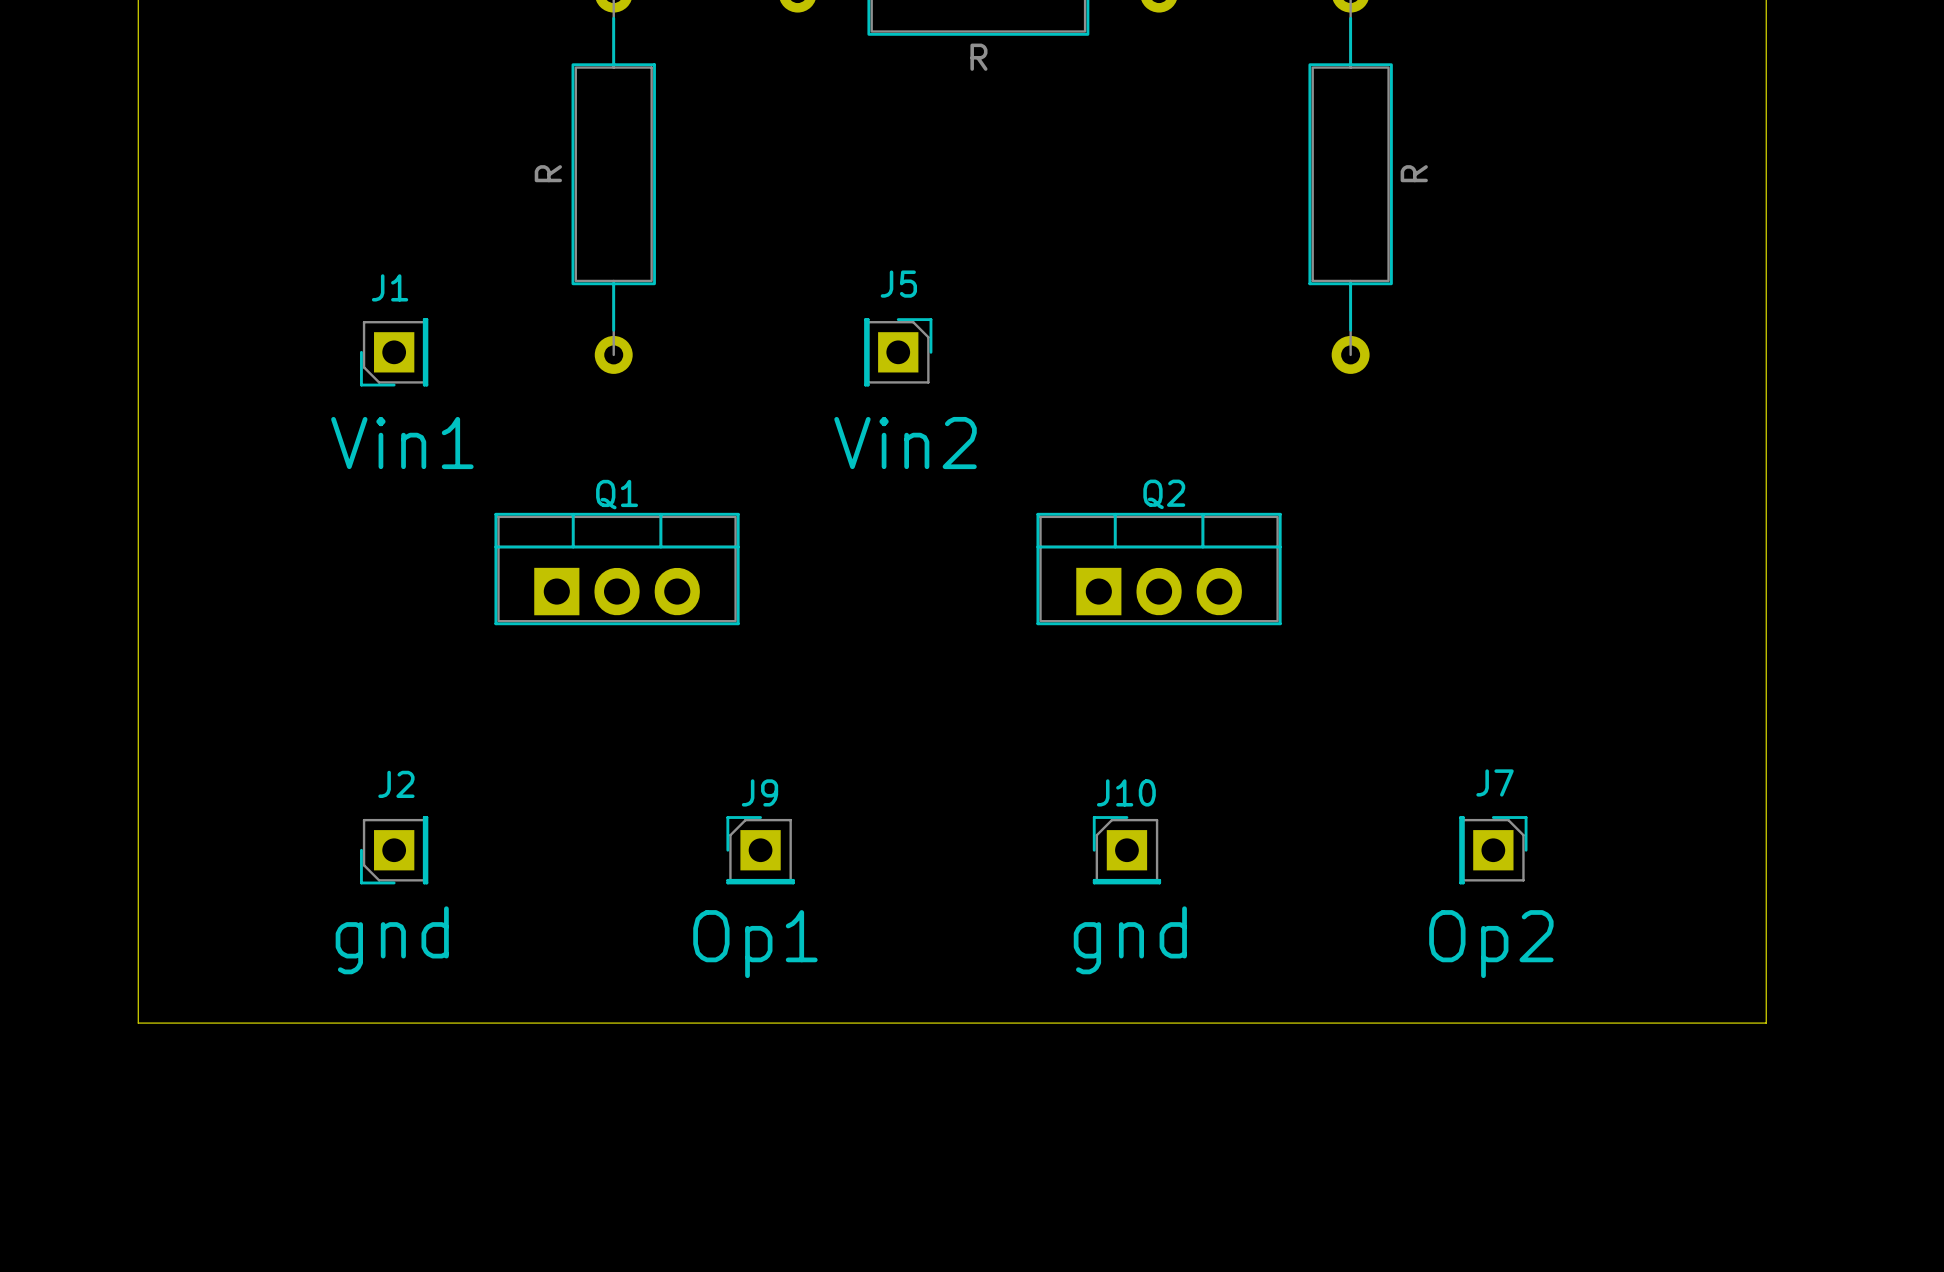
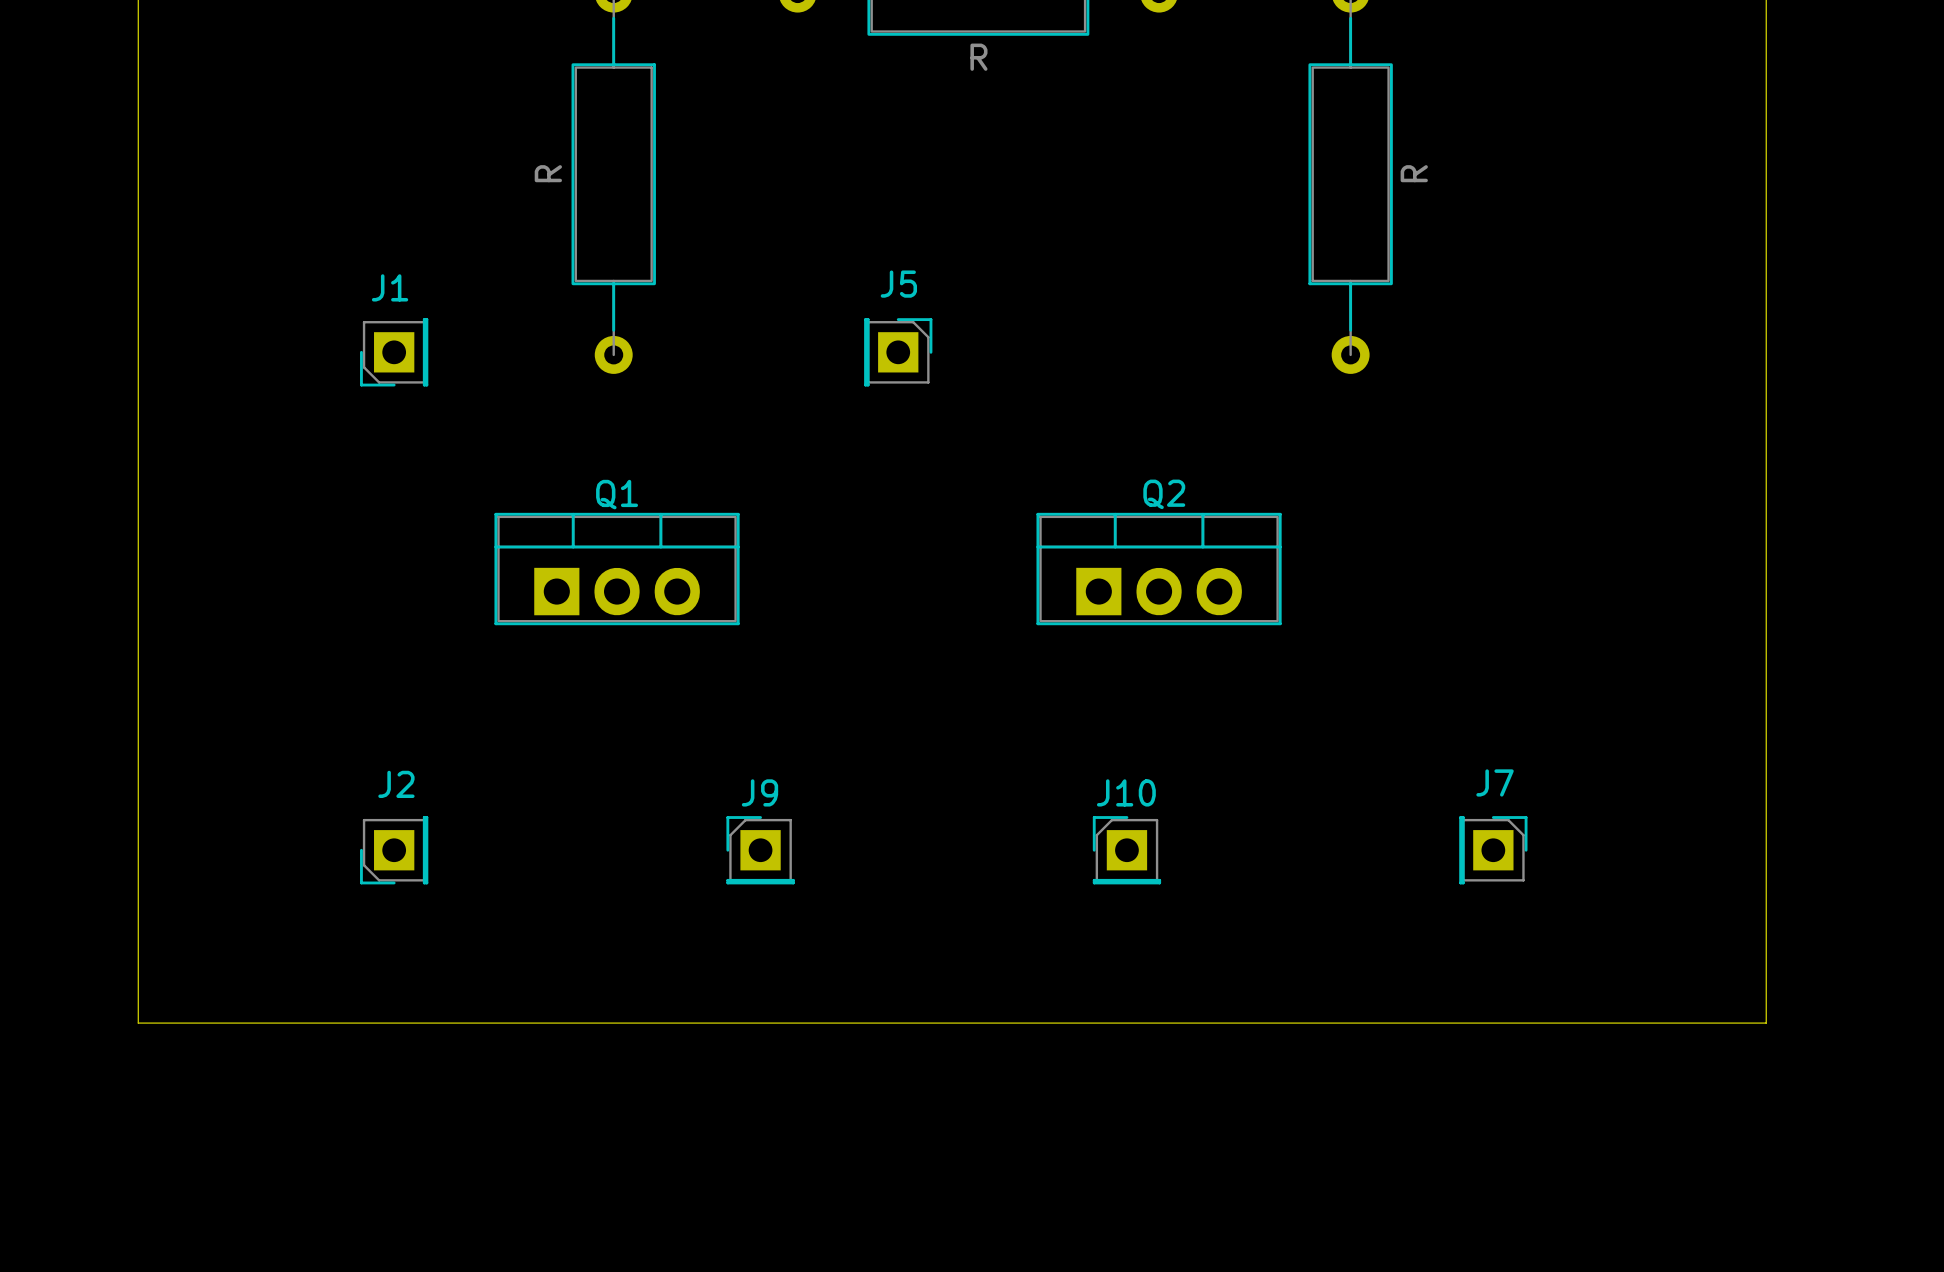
text: Vin1 (402, 443) -> none
text: Vin2 (905, 443) -> none
text: gnd (392, 940) -> none
text: gnd (1130, 940) -> none
text: Op1 (755, 944) -> none
text: Op2 (1491, 944) -> none

